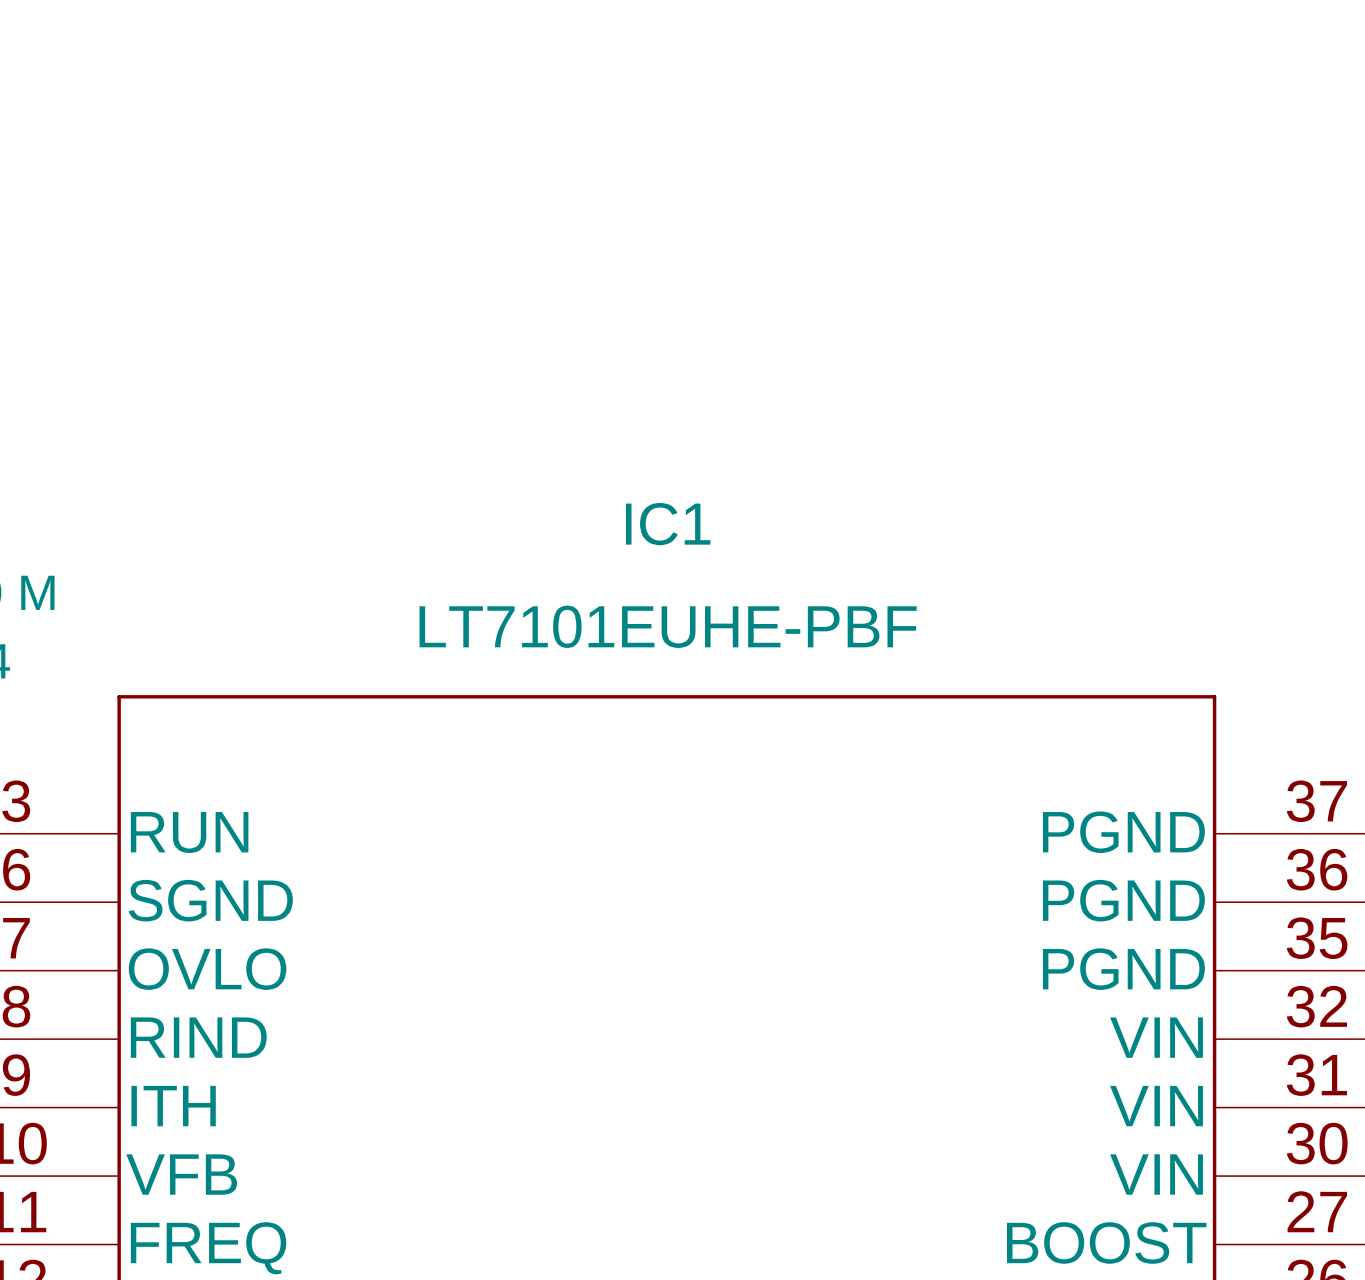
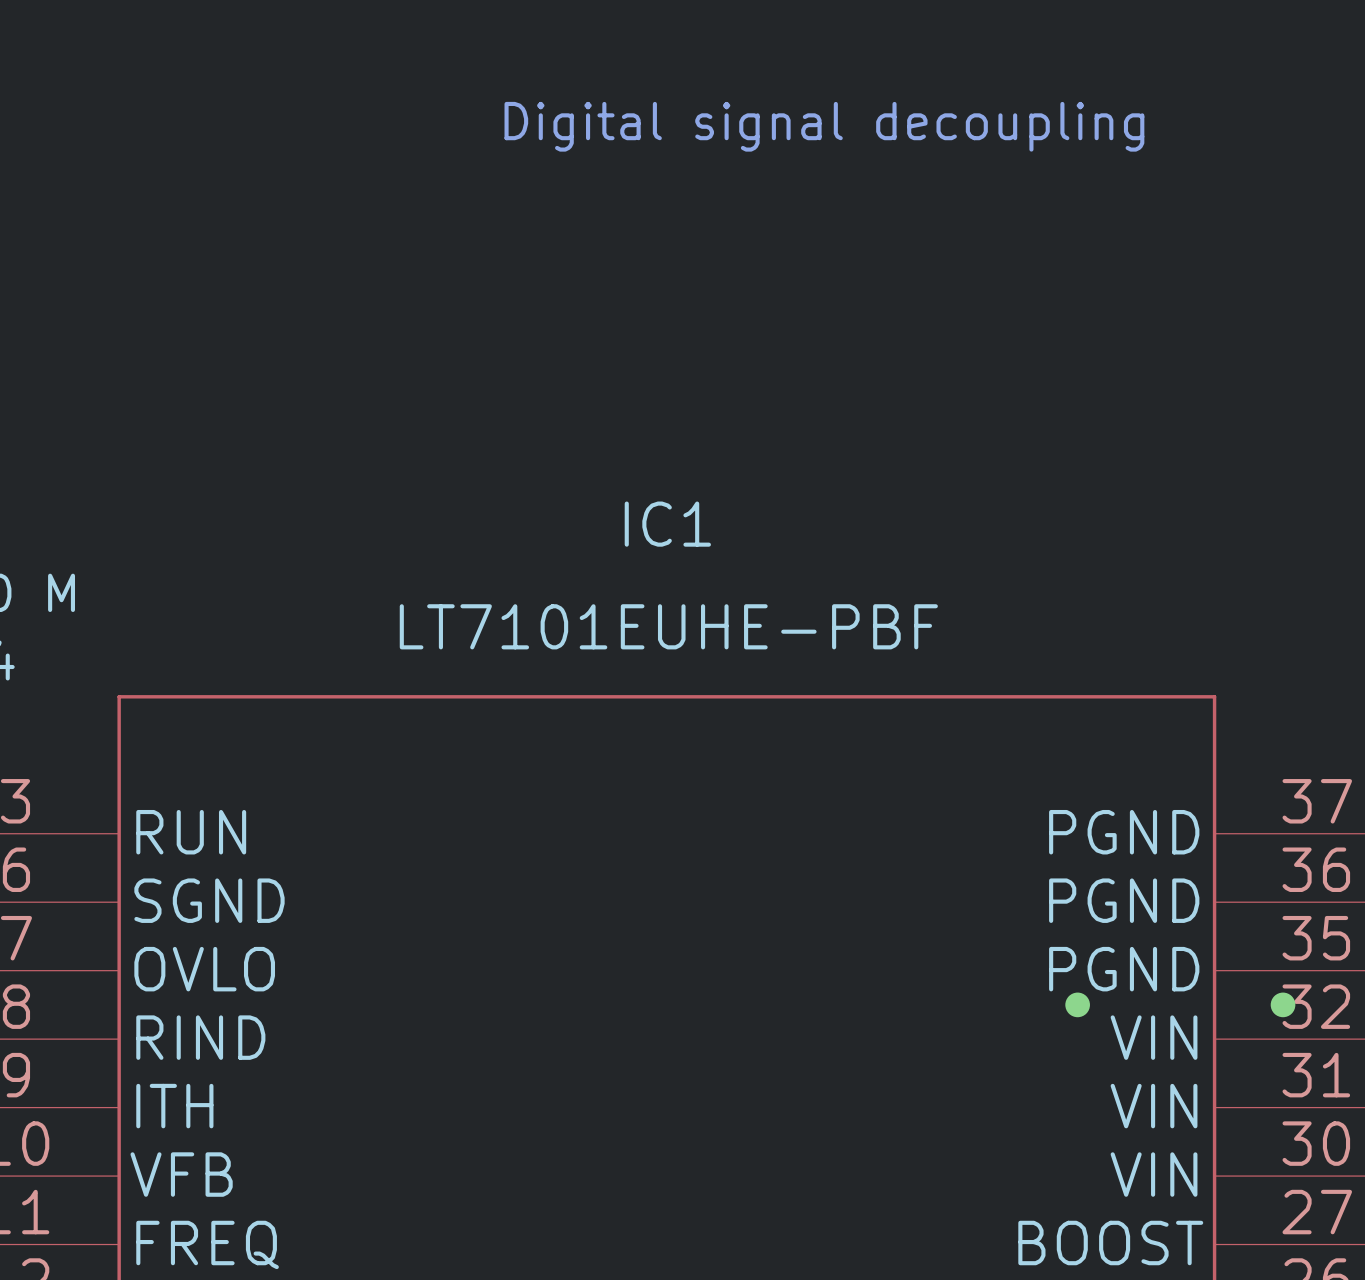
text: none -> Digital signal decoupling (824, 126)
junction: none -> (1077, 1004)
junction: none -> (1283, 1004)

